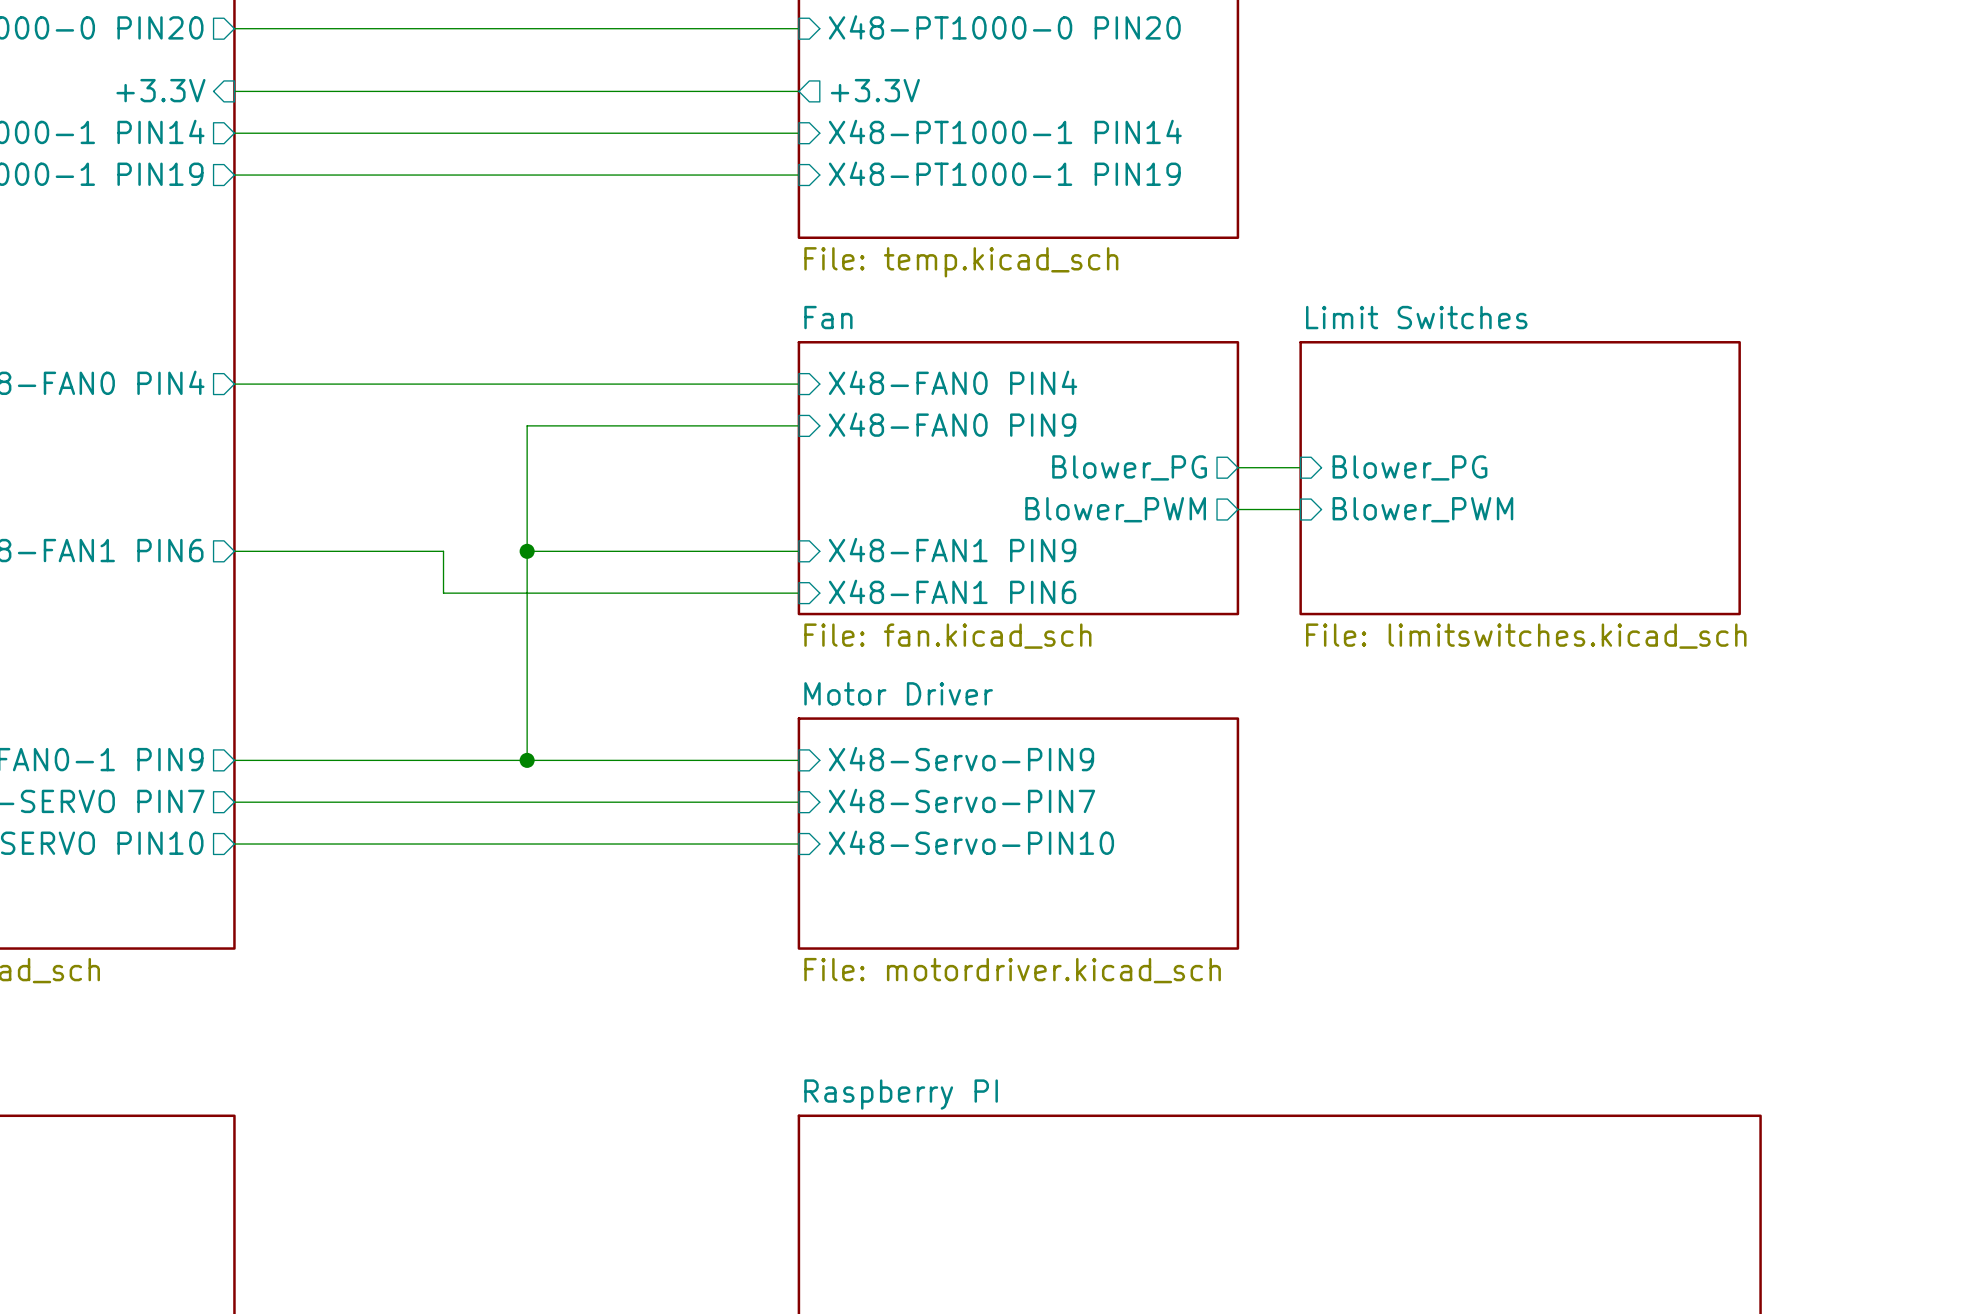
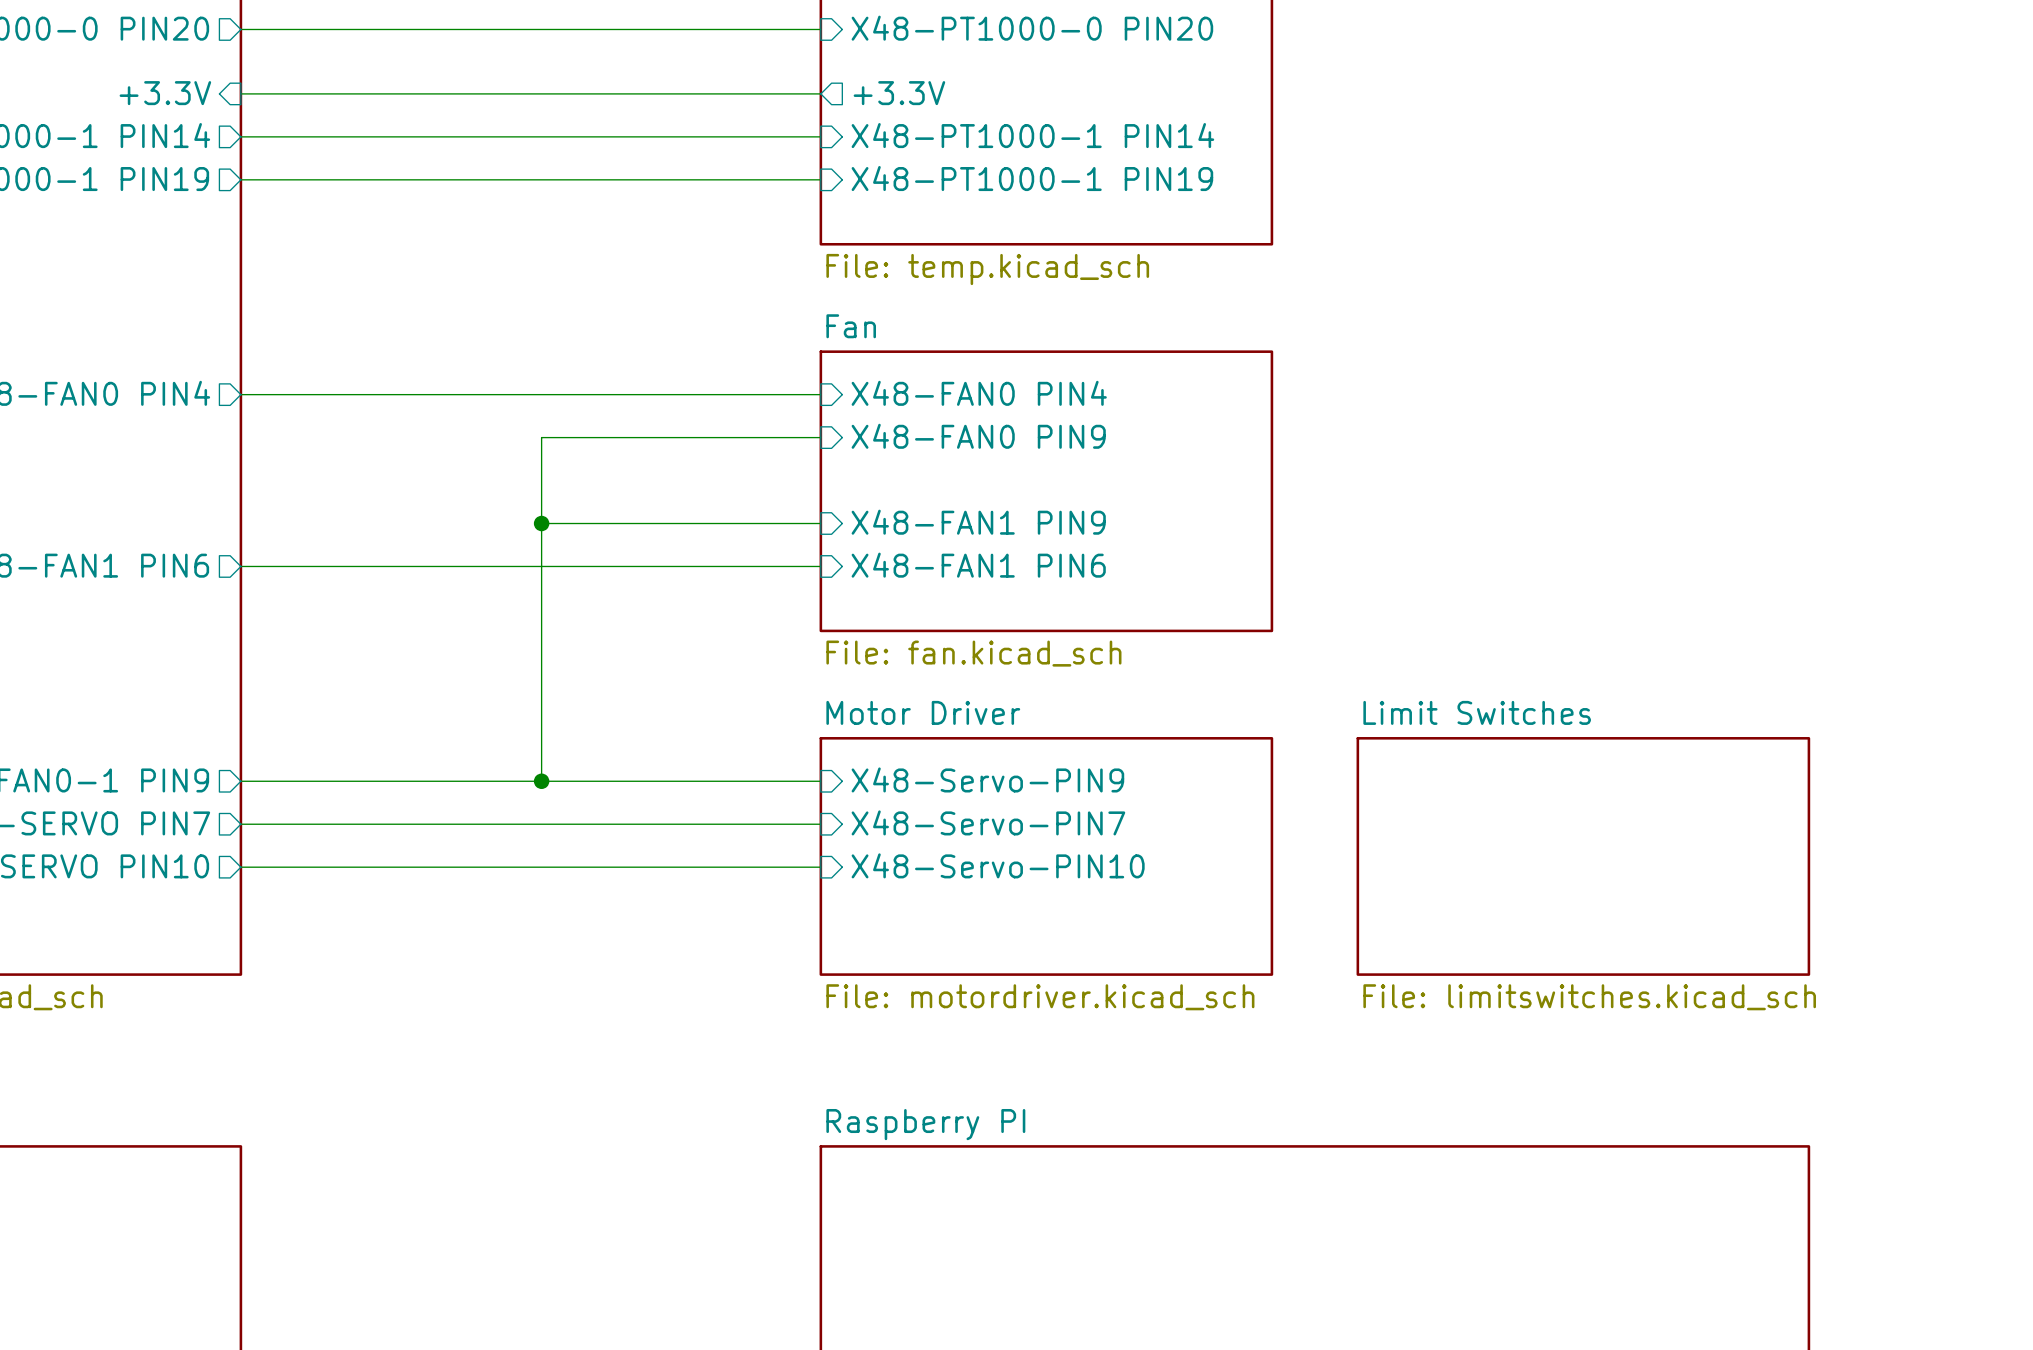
sheet pin: Blower_PG (1129, 467) -> none
wire: (1237, 467) (1300, 467) -> none
sheet pin: Blower_PG (1409, 467) -> none
sheet Limit Switches: File: limitswitches.kicad_sch (1520, 478) -> none
sheet pin: none -> X48-FAN1 PIN9 (978, 522)
wire: none -> (541, 523) (820, 523)
sheet pin: Blower_PWM (1115, 509) -> none
wire: (1237, 509) (1300, 509) -> none
sheet pin: Blower_PWM (1422, 509) -> none
sheet pin: X48-FAN1 PIN9 (952, 550) -> X48-FAN1 PIN6 (978, 565)
wire: (443, 551) (443, 593) (798, 593) -> (455, 566) (541, 566)
junction position: (527, 551) -> (541, 523)
sheet pin: X48-FAN1 PIN6 (952, 591) -> none
sheet Limit Switches: none -> File: limitswitches.kicad_sch (1583, 856)

